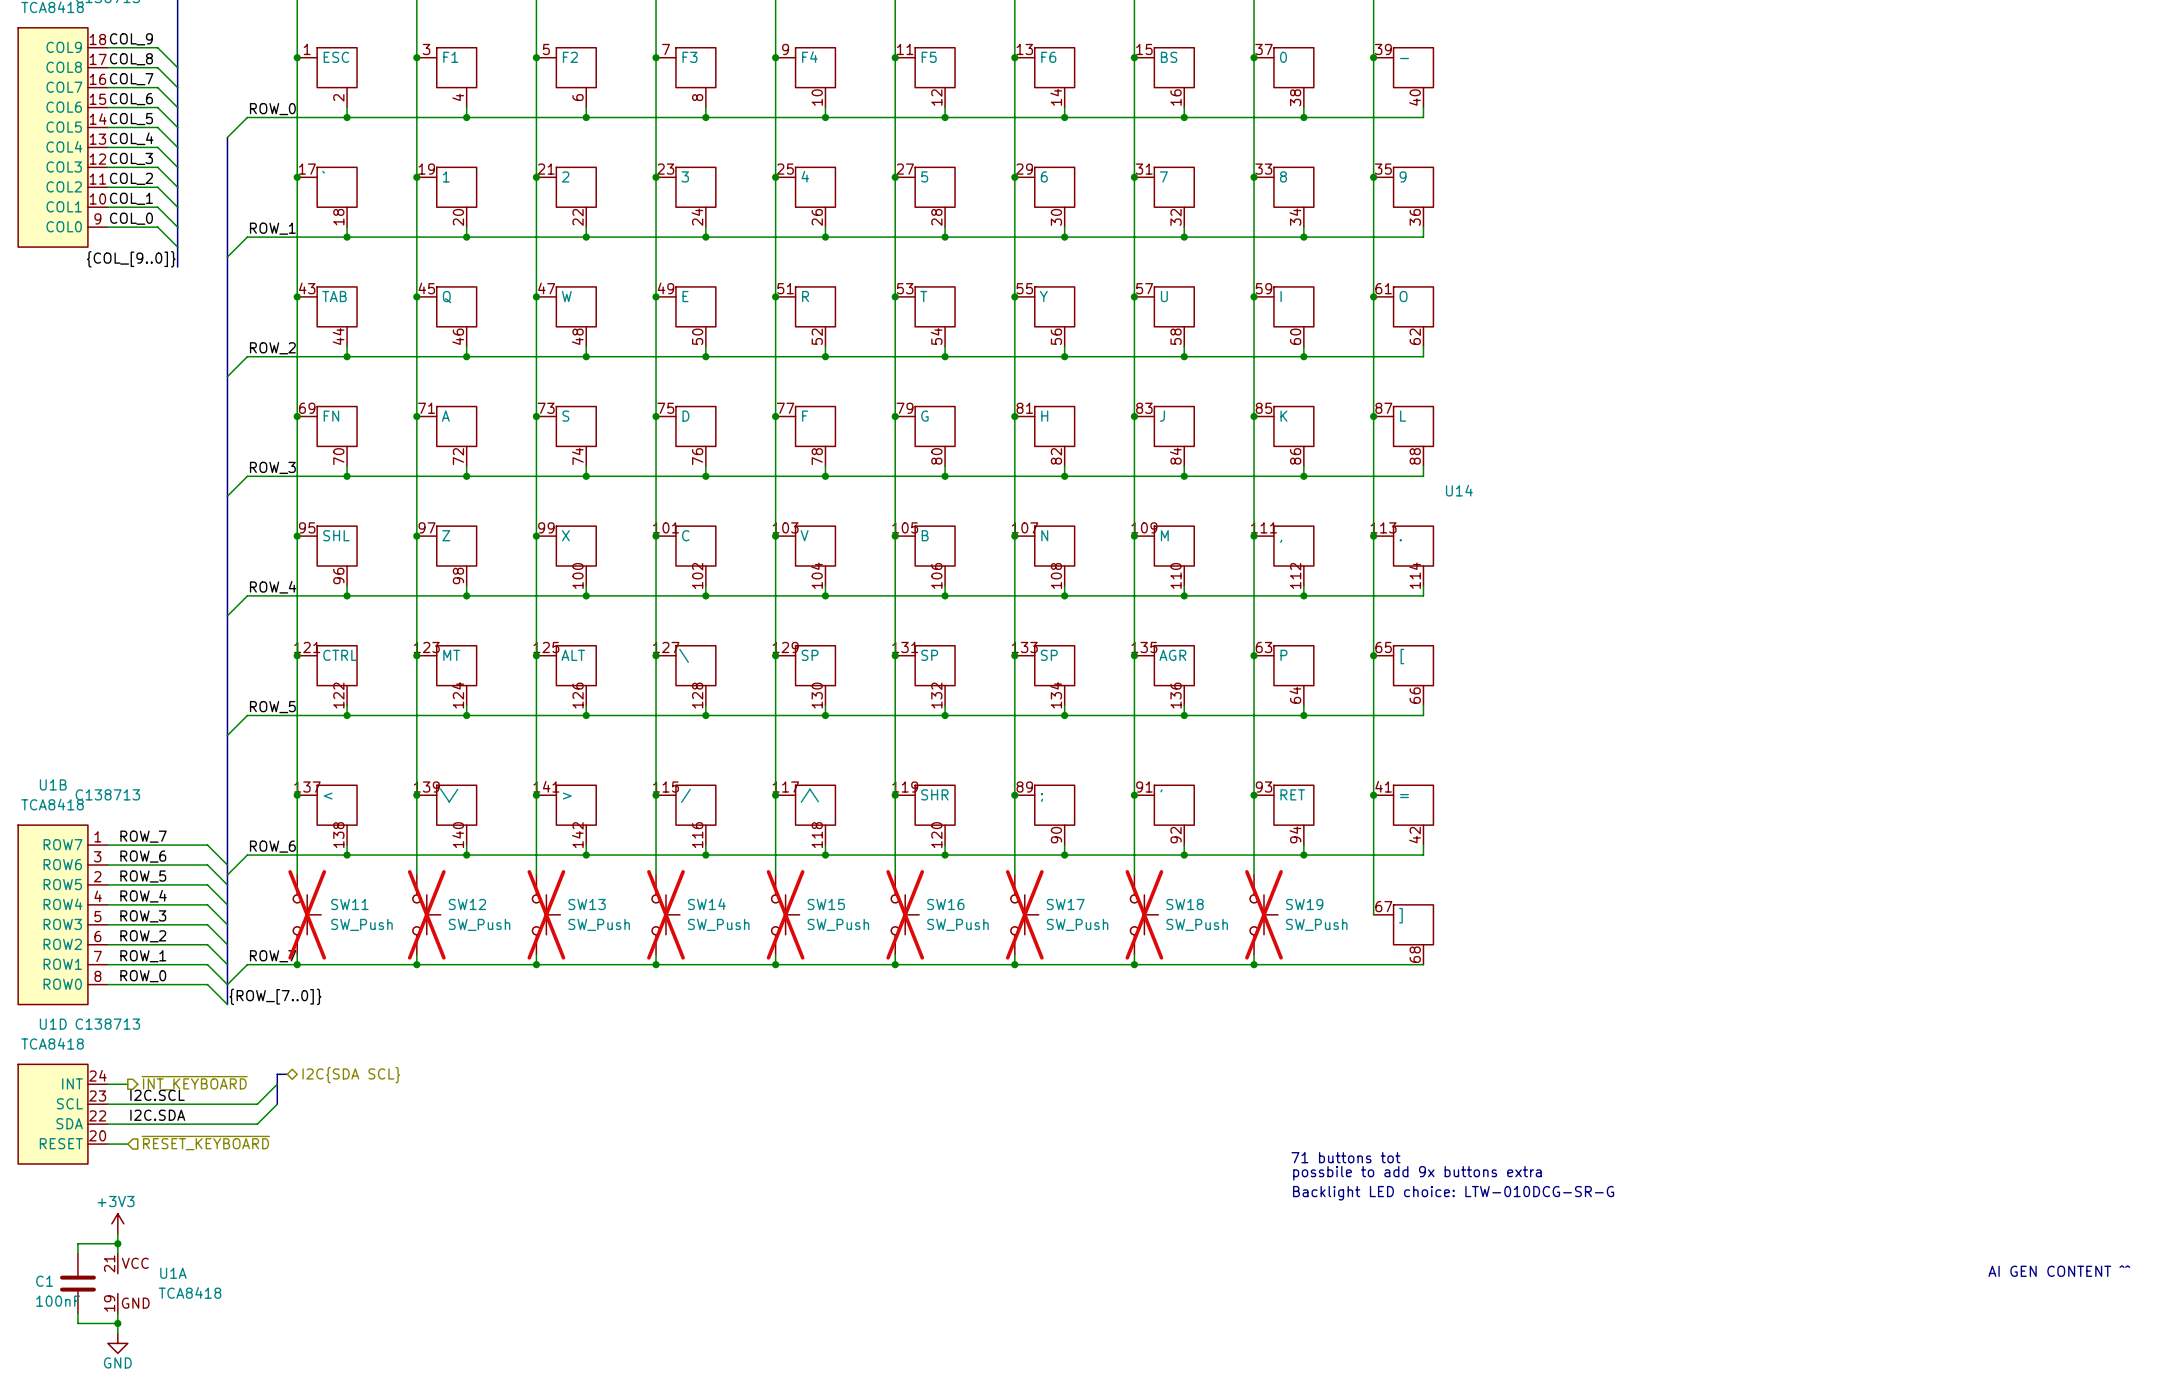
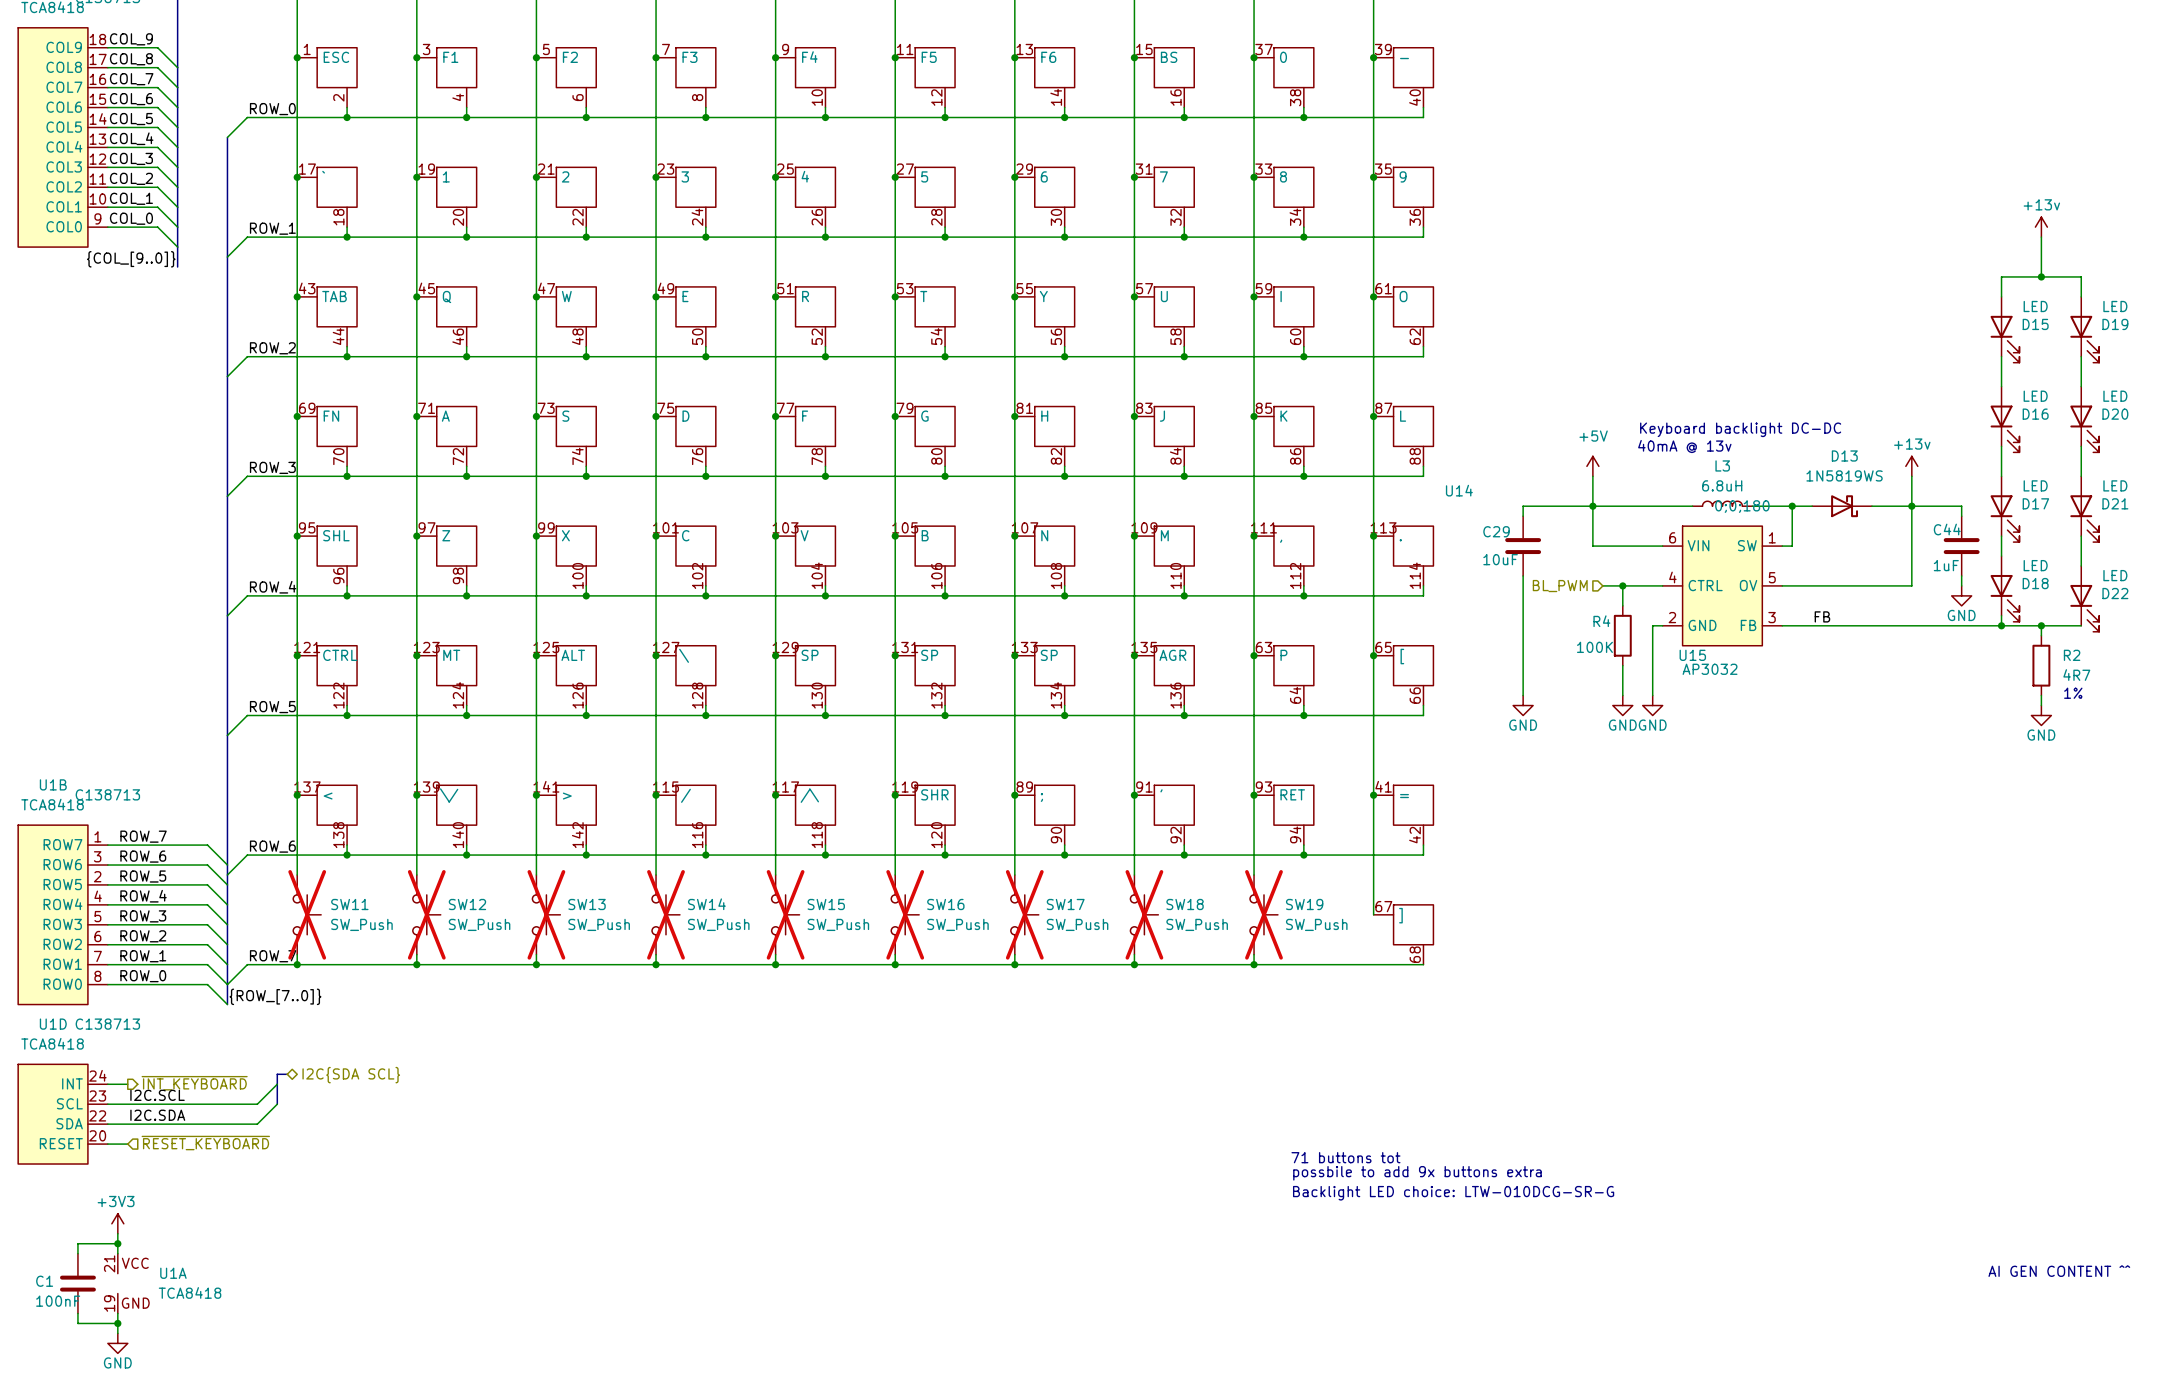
power symbol: none -> +13v (2041, 227)
wire: none -> (2041, 237) (2041, 276)
junction: none -> (2041, 276)
wire: none -> (2001, 296) (2001, 276) (2081, 276) (2081, 296)
D15: none -> LED (2005, 329)
D19: none -> LED (2084, 329)
wire: none -> (2001, 356) (2001, 386)
wire: none -> (2081, 356) (2081, 386)
D16: none -> LED (2005, 419)
D20: none -> LED (2084, 419)
text: none -> Keyboard backlight DC-DC (1740, 429)
text: none -> 40mA @ 13v (1684, 446)
wire: none -> (2001, 446) (2001, 476)
wire: none -> (2081, 446) (2081, 476)
power symbol: none -> +5V (1592, 466)
power symbol: none -> +13v (1911, 466)
wire: none -> (1592, 476) (1592, 546) (1662, 546)
wire: none -> (1911, 476) (1911, 585) (1782, 585)
L3: none -> 6.8uH (1722, 503)
junction: none -> (1592, 506)
wire: none -> (1692, 506) (1523, 506) (1523, 516)
wire: none -> (1752, 506) (1812, 506)
wire: none -> (1792, 506) (1792, 546) (1782, 546)
junction: none -> (1792, 506)
D13: none -> 1N5819WS (1842, 506)
wire: none -> (1871, 506) (1961, 506) (1961, 516)
junction: none -> (1911, 506)
D17: none -> LED (2005, 509)
D21: none -> LED (2084, 509)
wire: none -> (2001, 536) (2001, 556)
wire: none -> (2081, 536) (2081, 566)
C29: none -> 10uF (1523, 546)
C44: none -> 1uF (1961, 546)
wire: none -> (1523, 575) (1523, 695)
wire: none -> (1961, 575) (1961, 585)
wire: none -> (1602, 585) (1662, 585)
wire: none -> (1622, 585) (1622, 605)
junction: none -> (1622, 585)
U15: none -> AP3032 (1722, 585)
hierarchical label: none -> BL_PWM (1560, 586)
D18: none -> LED (2005, 588)
power symbol: none -> GND (1961, 595)
D22: none -> LED (2084, 598)
wire: none -> (2001, 615) (2001, 625)
label: none -> FB (1822, 616)
wire: none -> (1662, 625) (1652, 625) (1652, 695)
wire: none -> (1782, 625) (2081, 625)
junction: none -> (2001, 625)
wire: none -> (2041, 625) (2041, 635)
junction: none -> (2041, 625)
R4: none -> 100K (1622, 635)
wire: none -> (1622, 665) (1622, 695)
R2: none -> 4R7 (2041, 665)
text: none -> 1% (2073, 693)
wire: none -> (2041, 695) (2041, 705)
power symbol: none -> GND (1523, 705)
power symbol: none -> GND (1622, 705)
power symbol: none -> GND (1652, 705)
power symbol: none -> GND (2041, 715)

